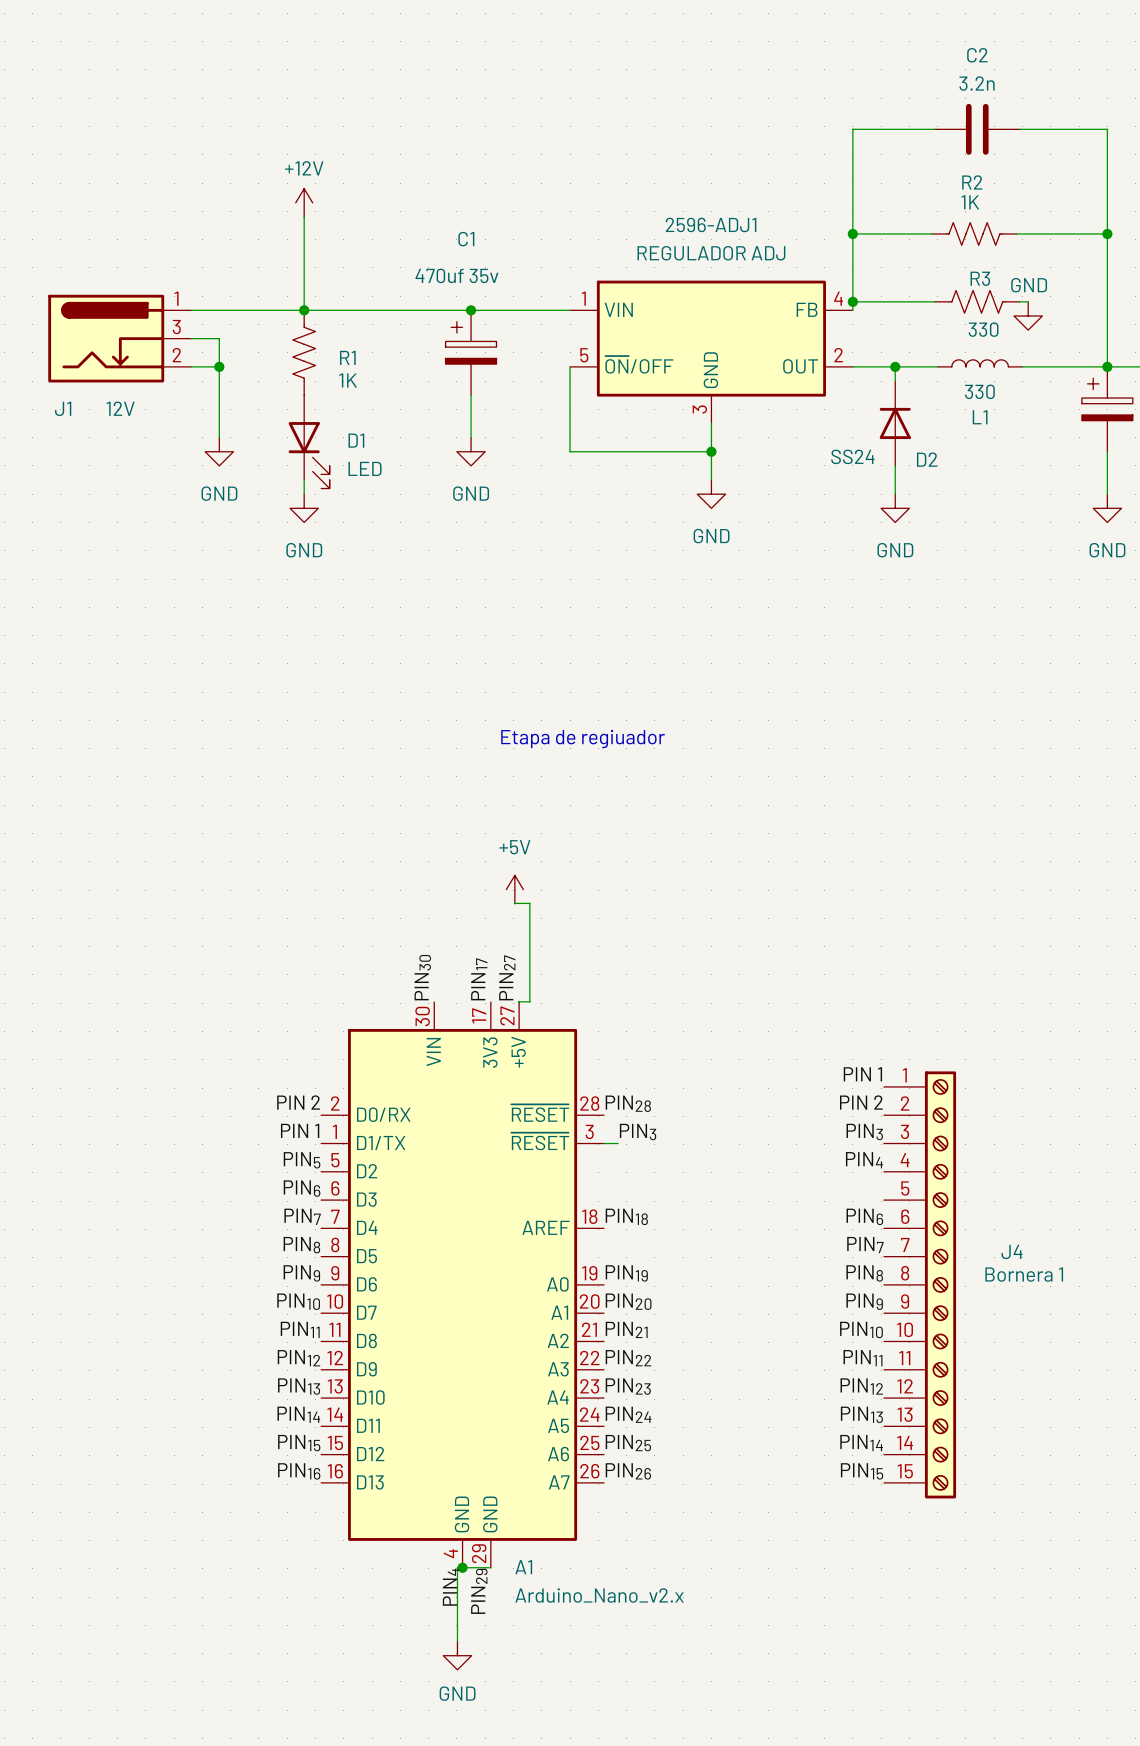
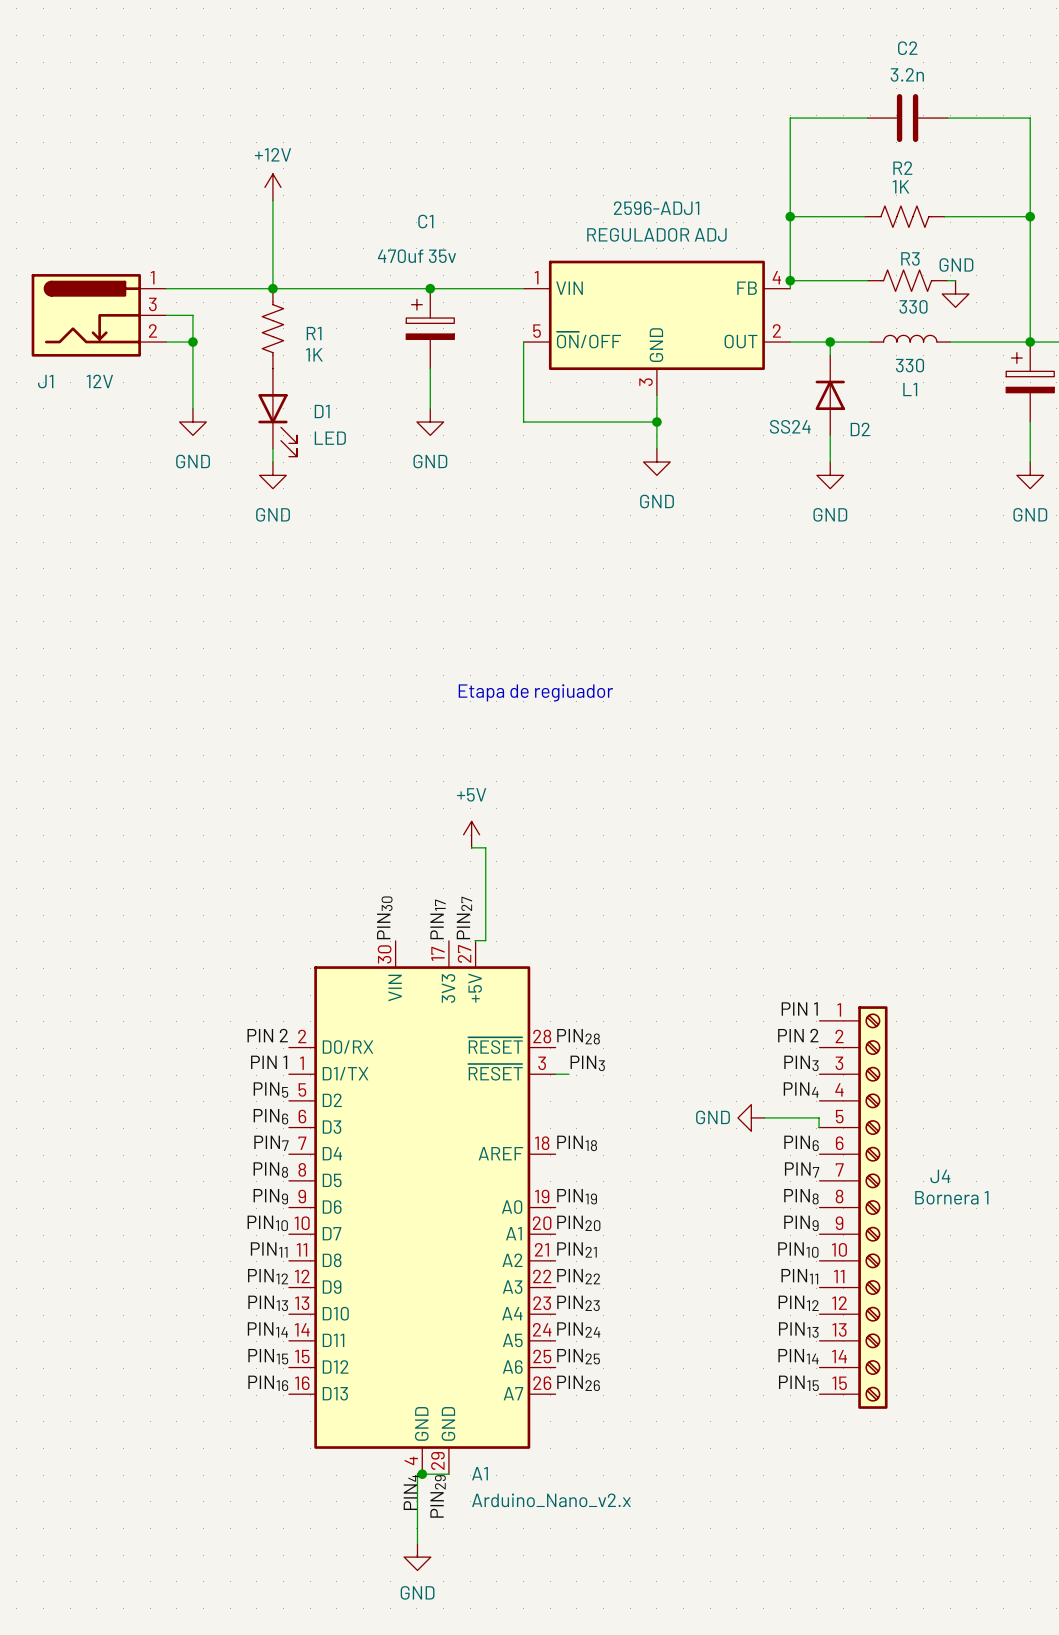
power symbol: none -> GND (751, 1117)
wire: none -> (764, 1117) (819, 1117) (819, 1127)

